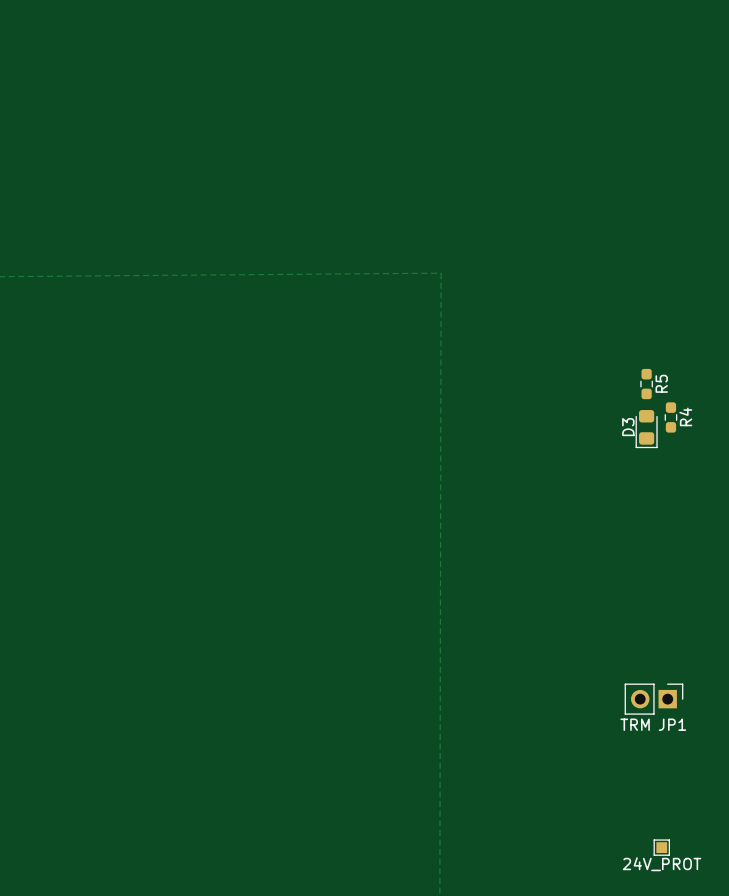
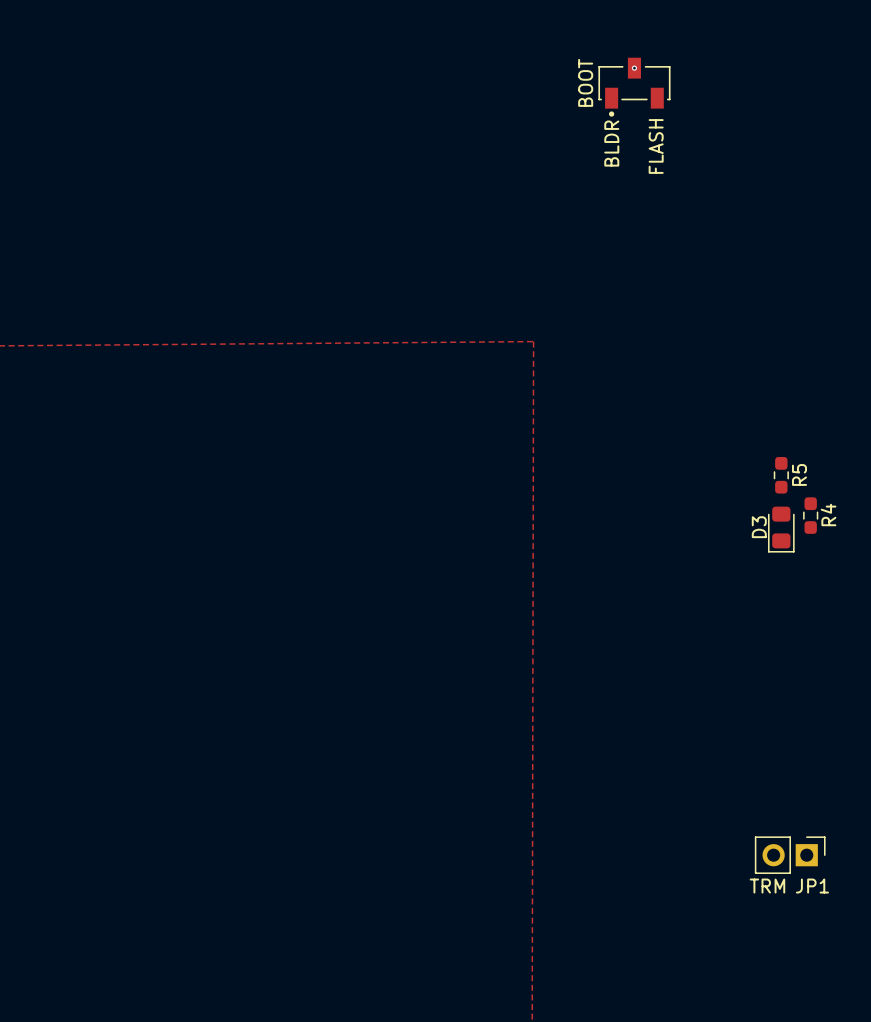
via: none -> (634, 68)
part: none -> BOOT (634, 87)
text: none -> BLDR (611, 143)
text: none -> FLASH (656, 146)

